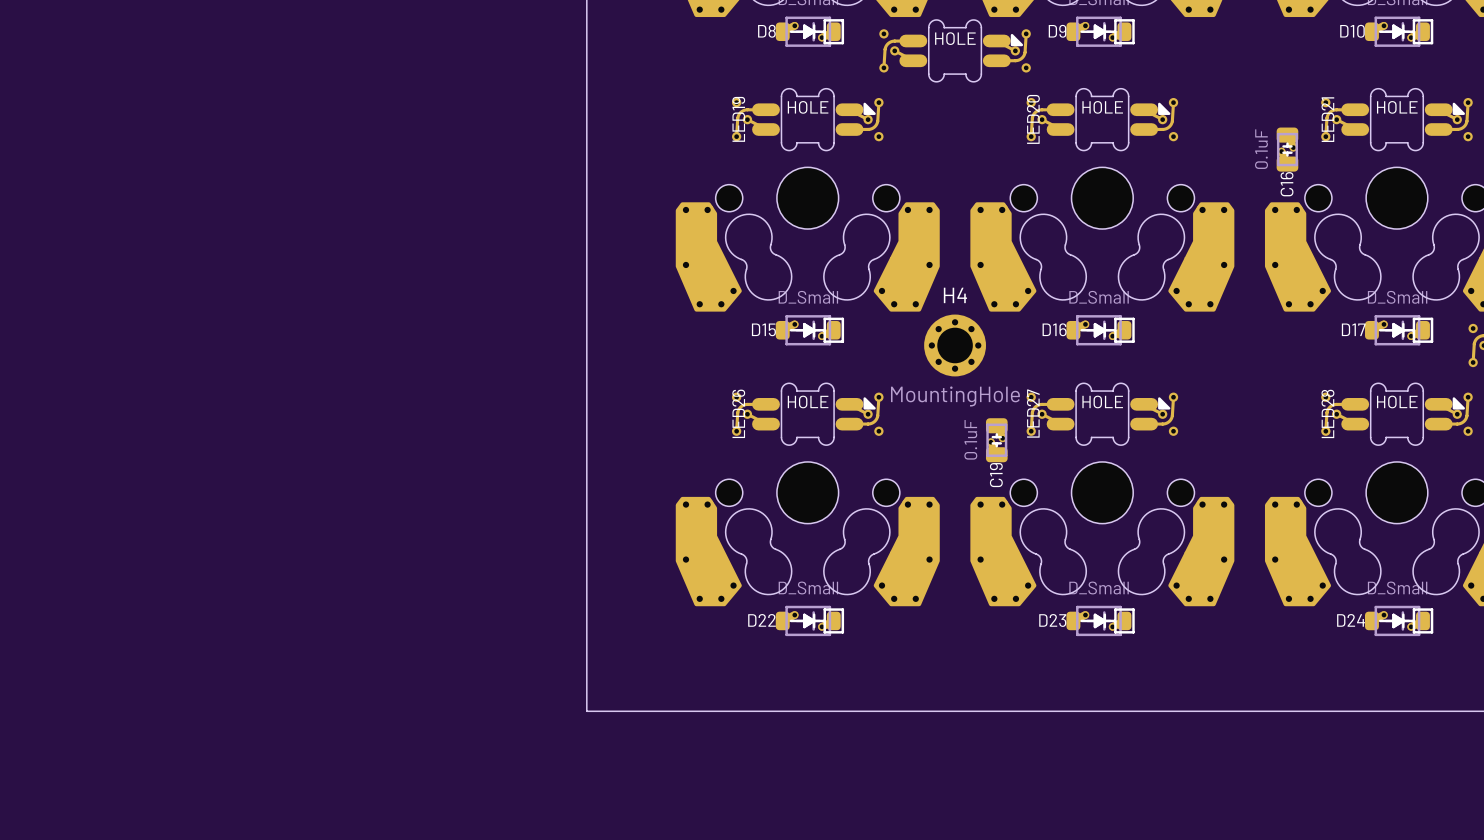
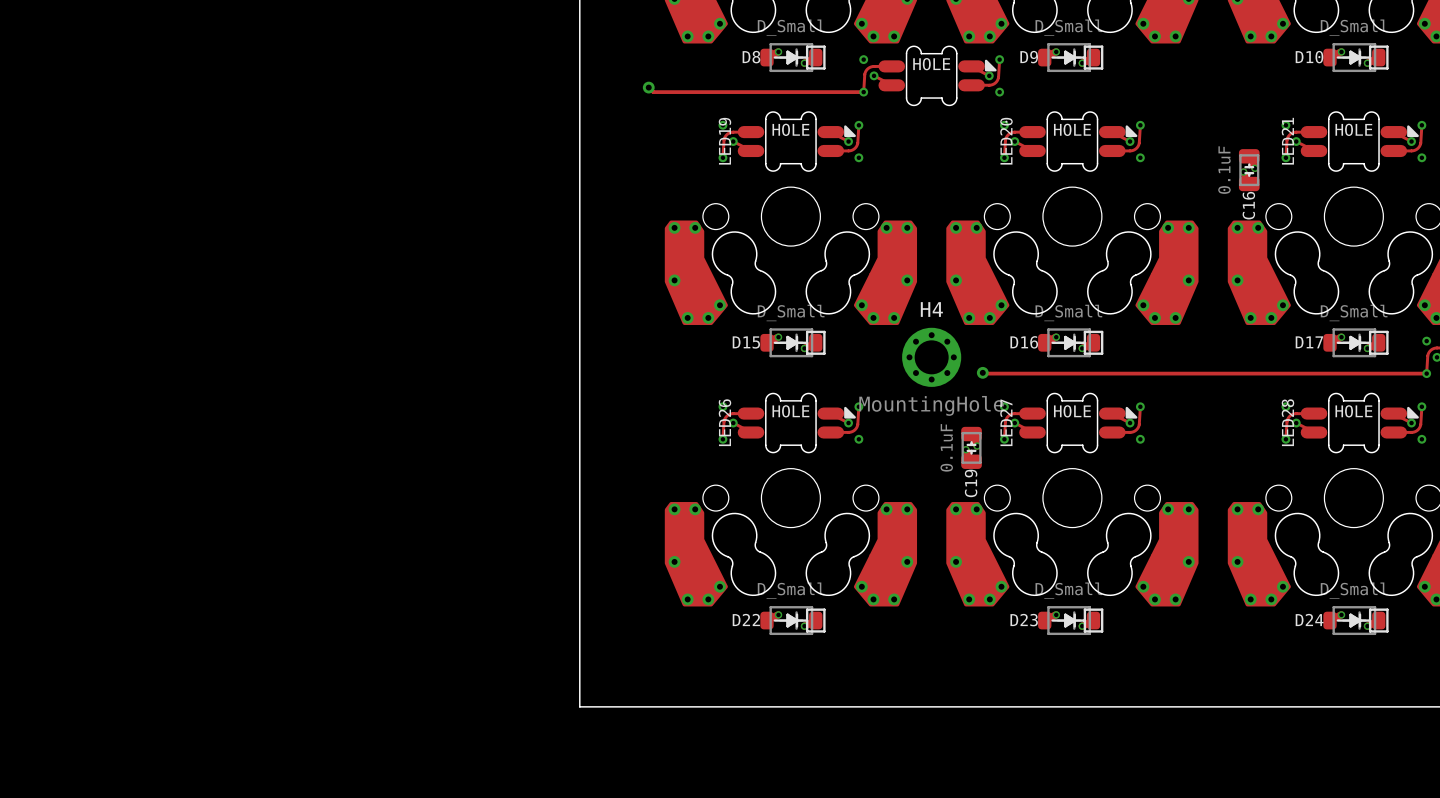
track: none -> (648, 87) (653, 92) (863, 92)
via: none -> (648, 87)
track: none -> (982, 372) (1426, 373)
via: none -> (982, 372)

